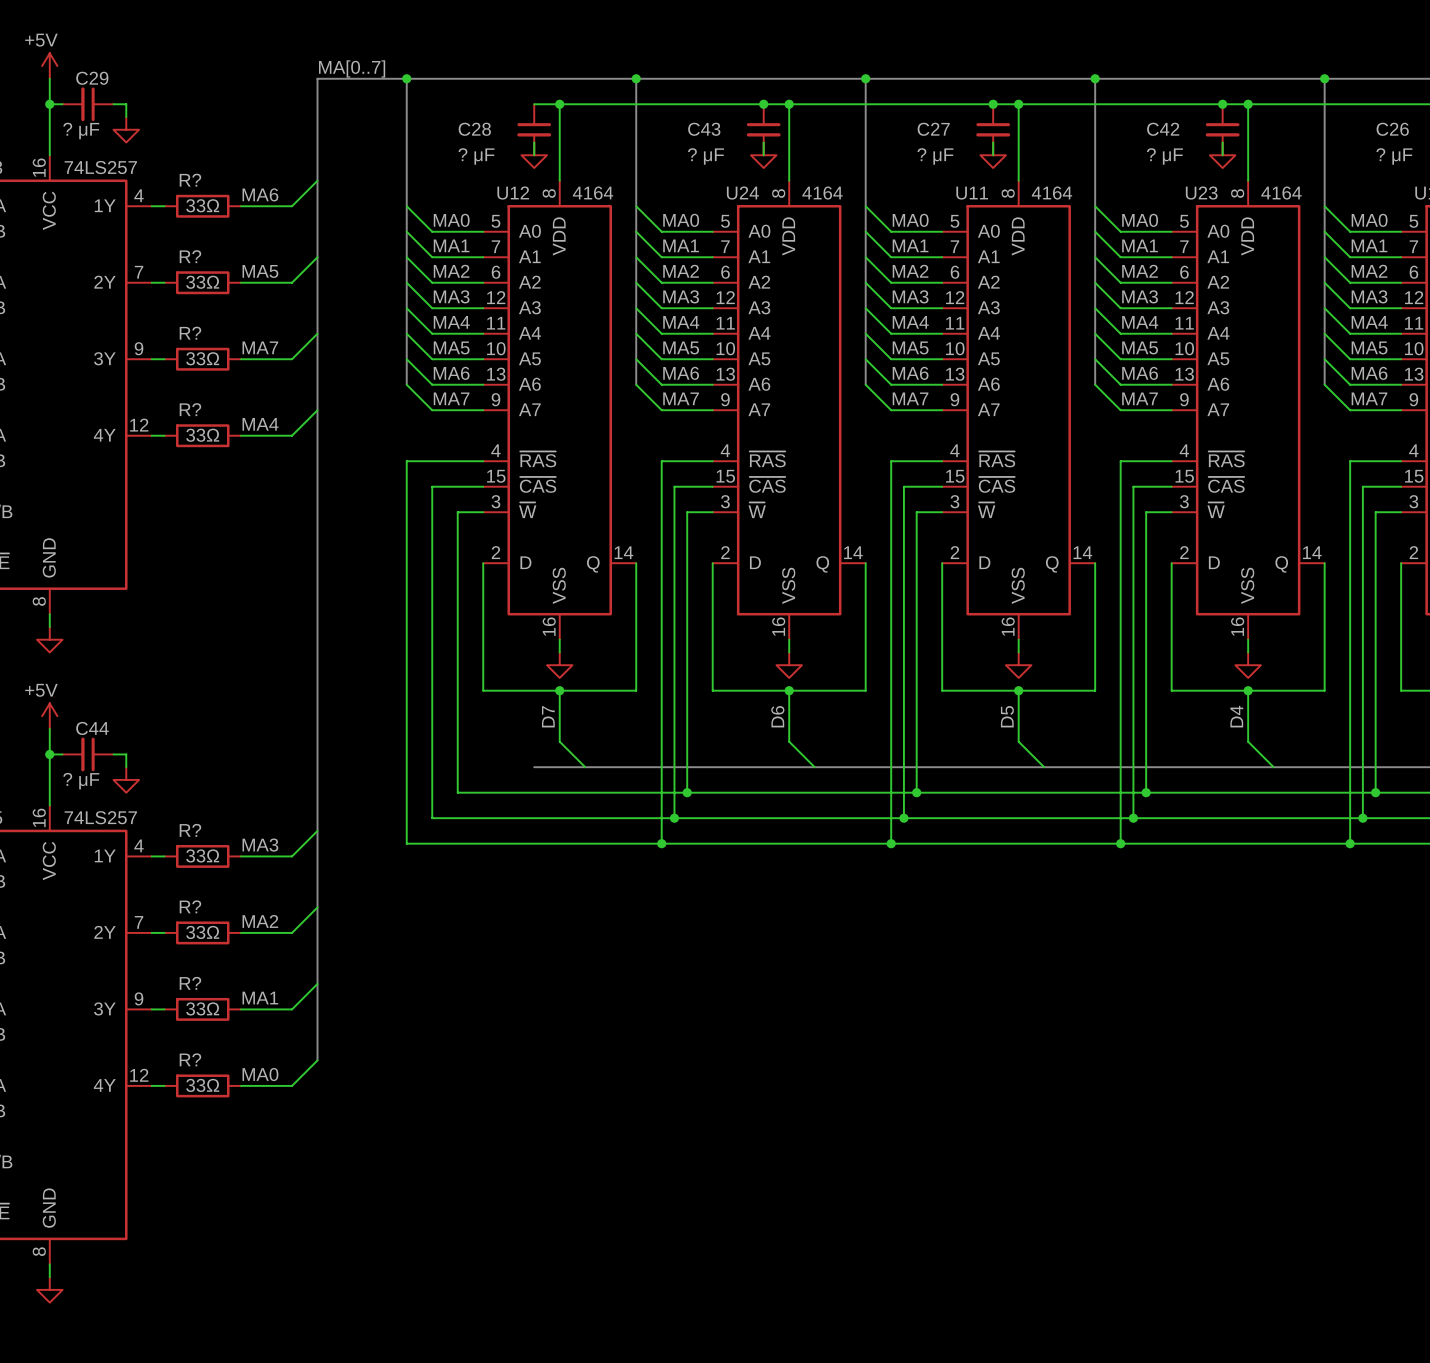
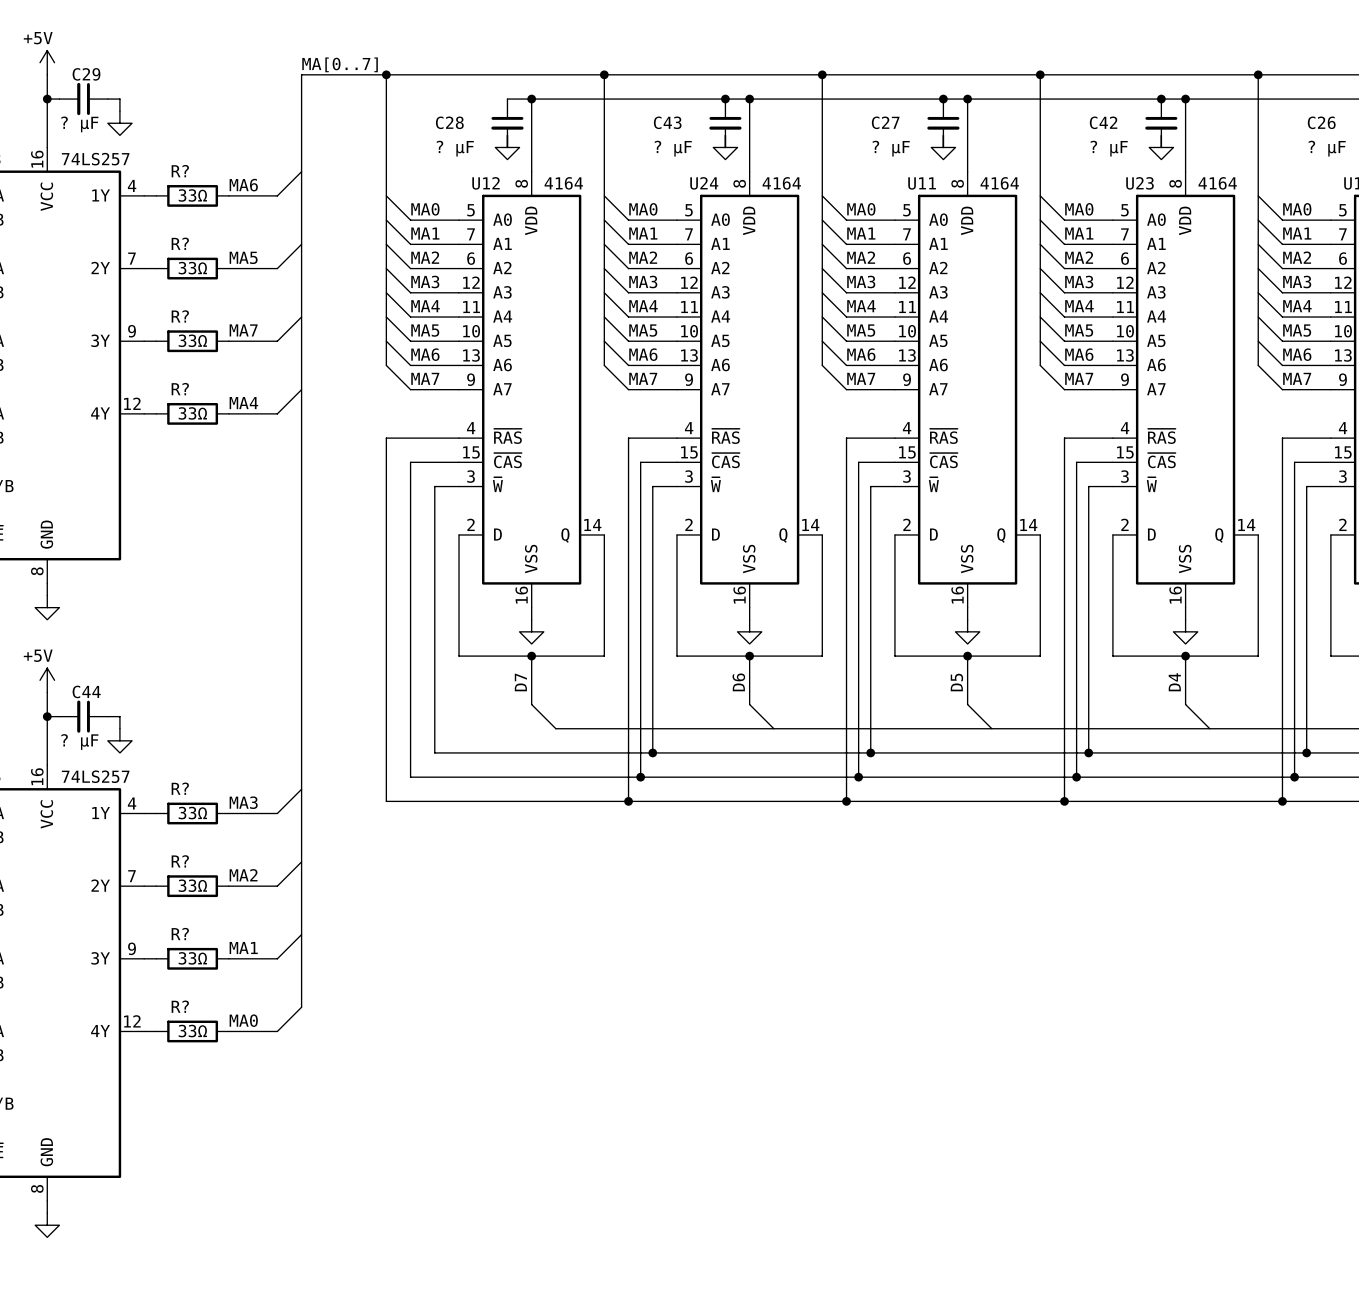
bus: (534, 767) (585, 767) -> none

